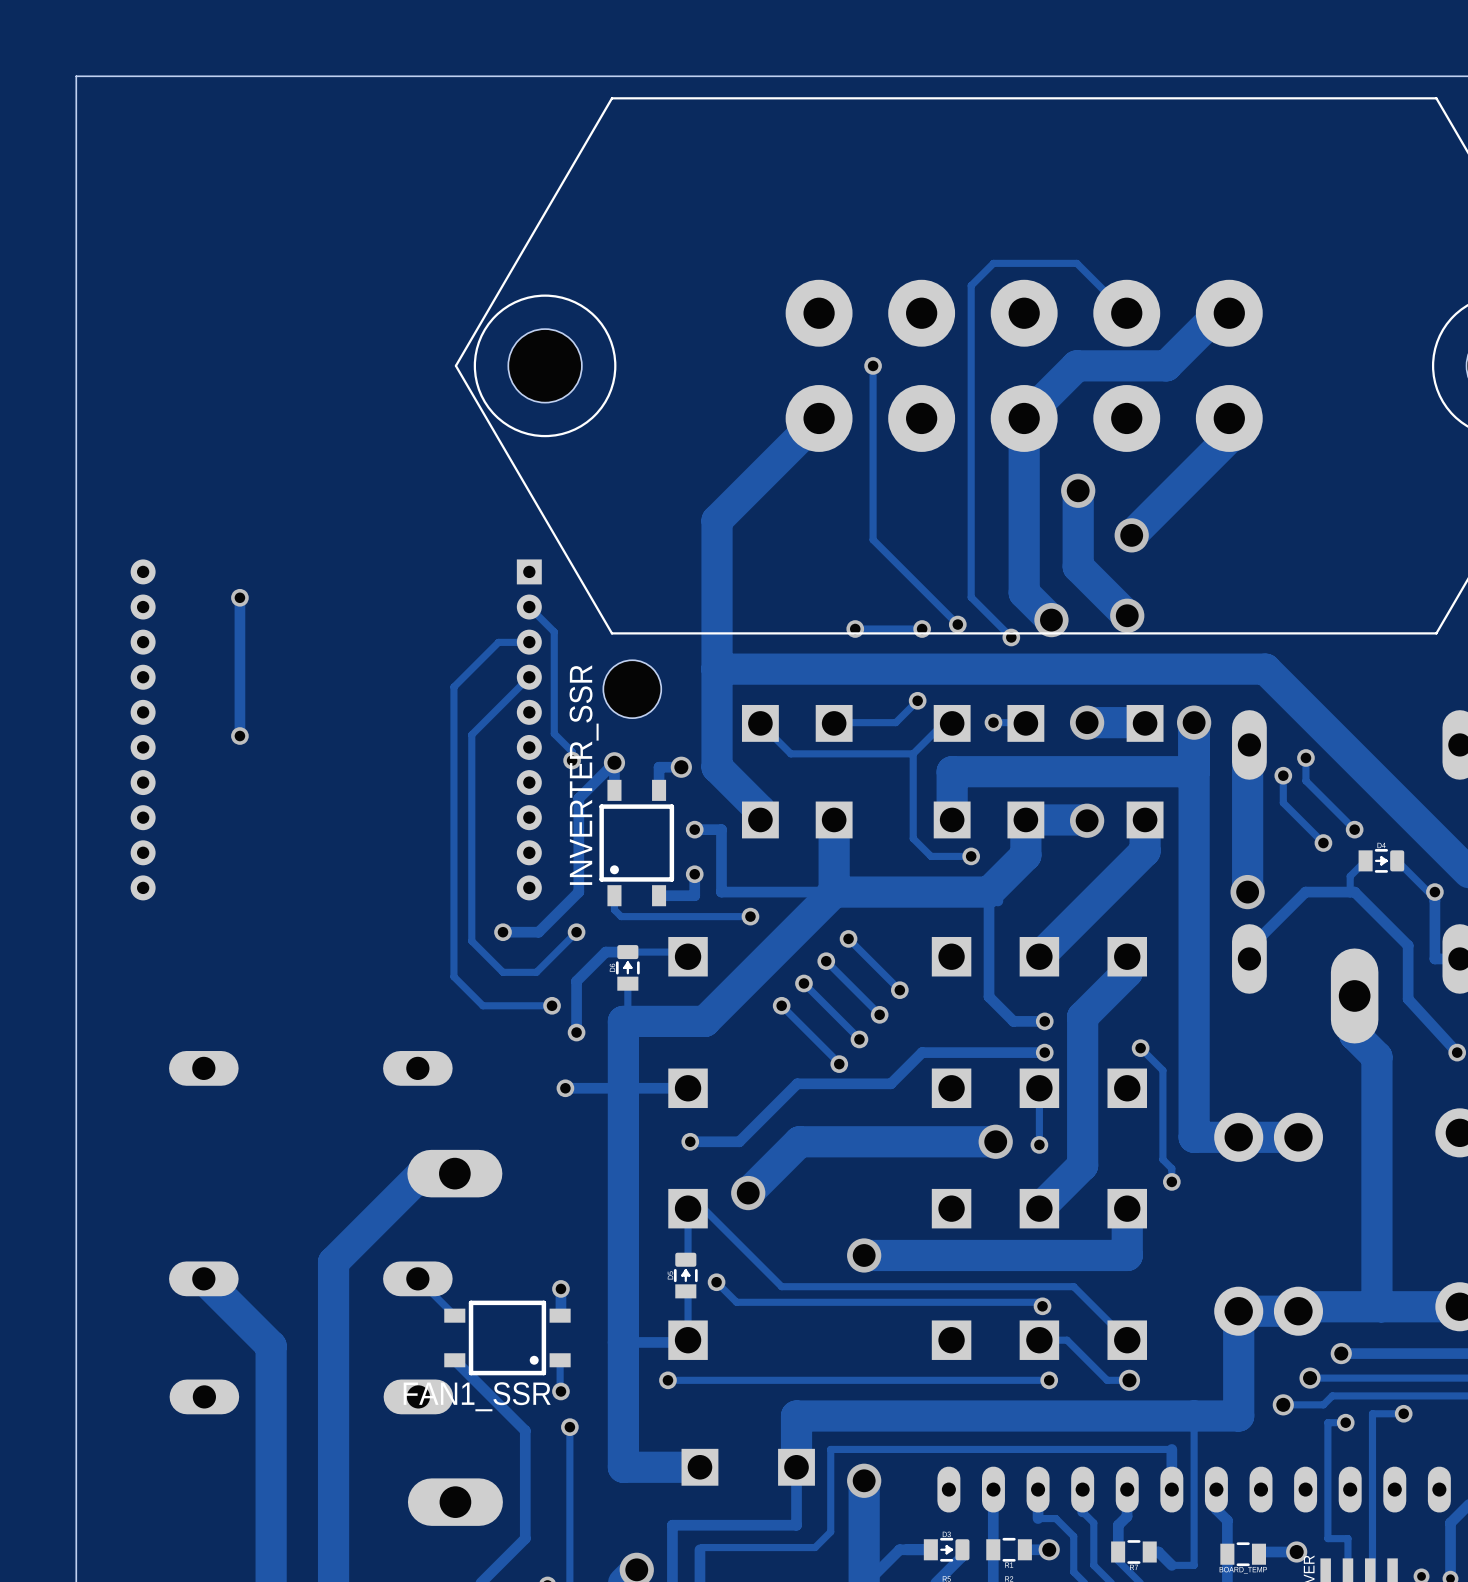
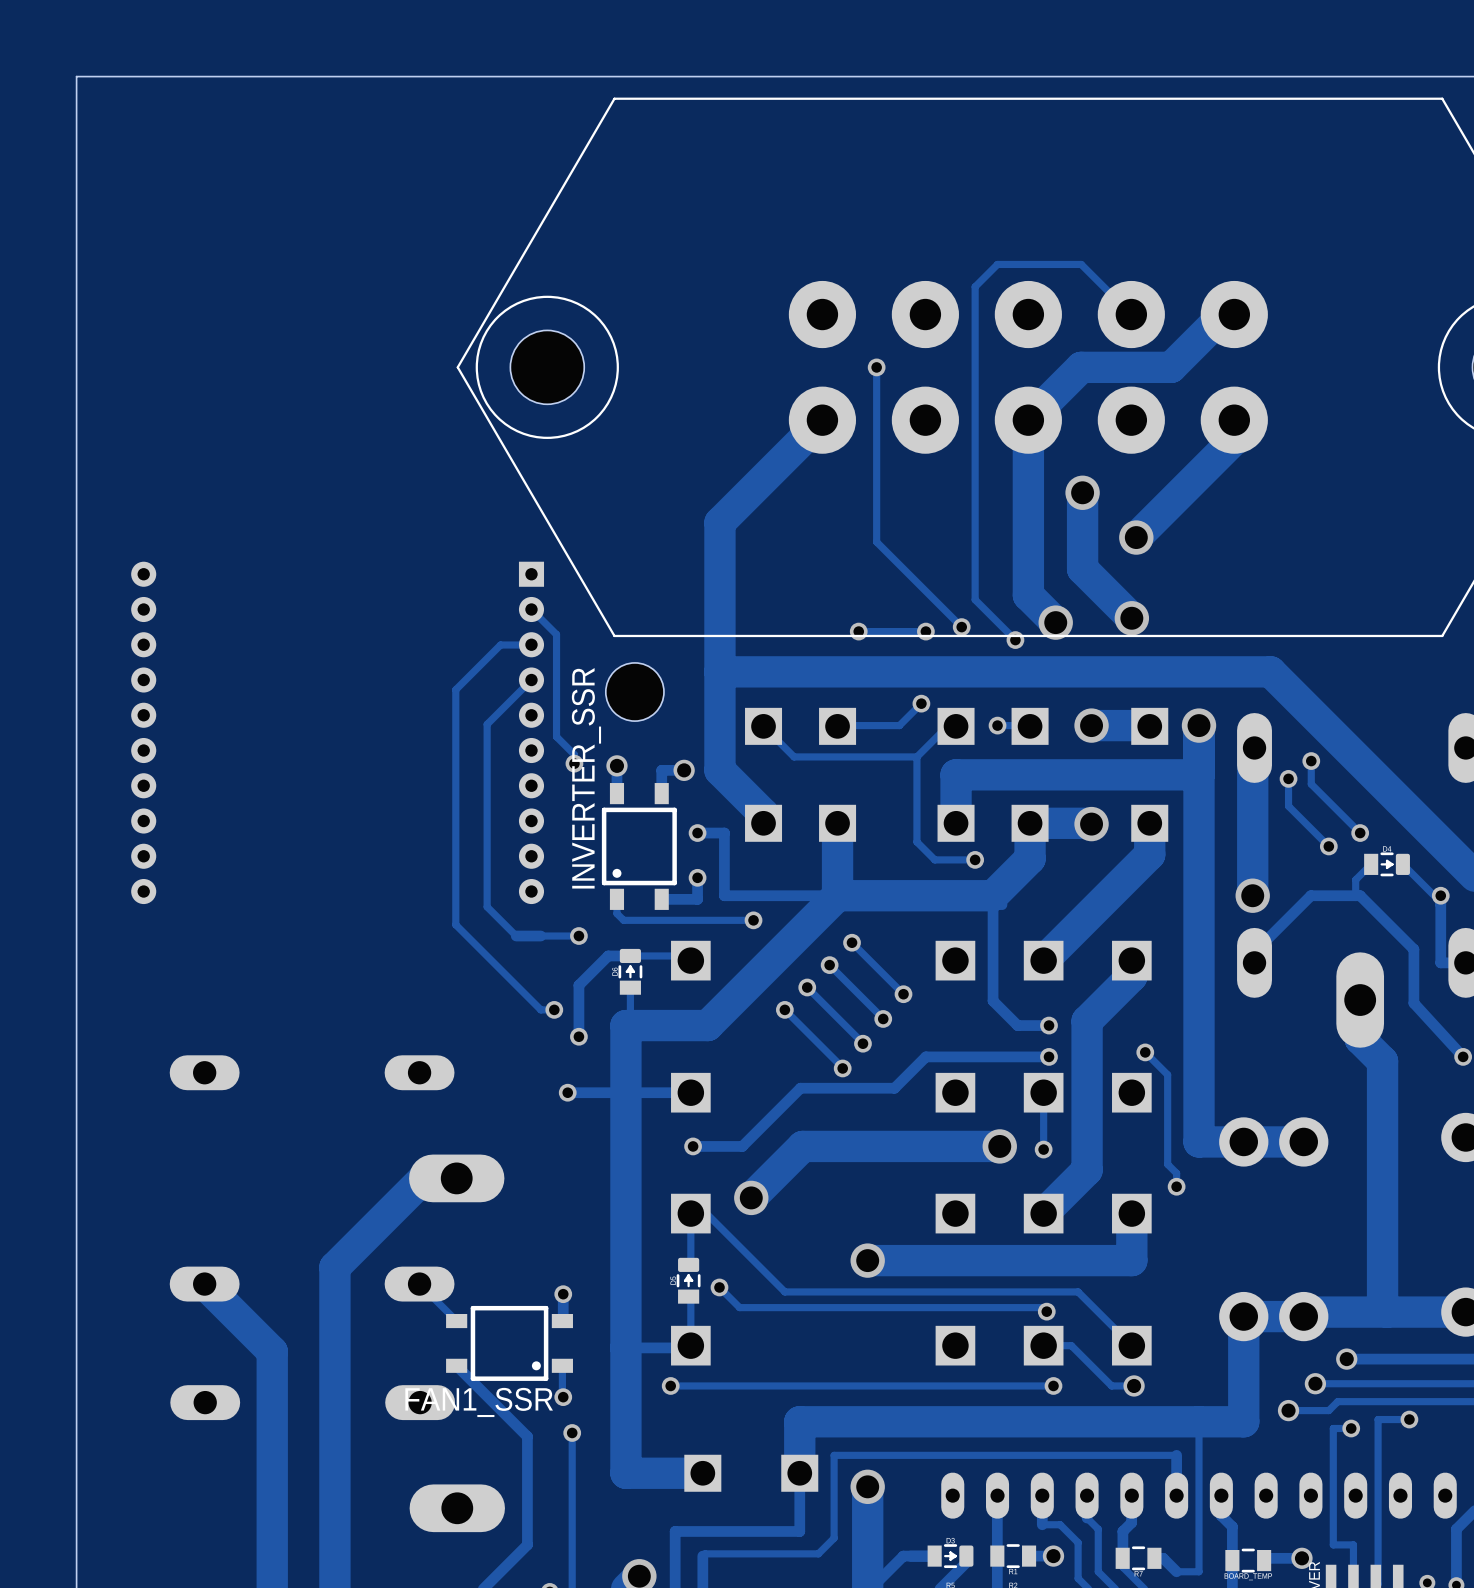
track: (239, 597) (239, 736) -> none
via: (239, 597) -> none
track: (485, 721) (471, 734) (471, 941) (503, 972) (536, 972) (576, 932) -> (487, 724) (487, 906) (516, 936)
via: (239, 736) -> none
track: (614, 762) (578, 798) (578, 892) (538, 932) -> (578, 936) (540, 936)
track: (453, 921) (453, 976) (482, 1005) (538, 1005) -> (455, 924) (540, 1009)
via: (503, 932) -> none

